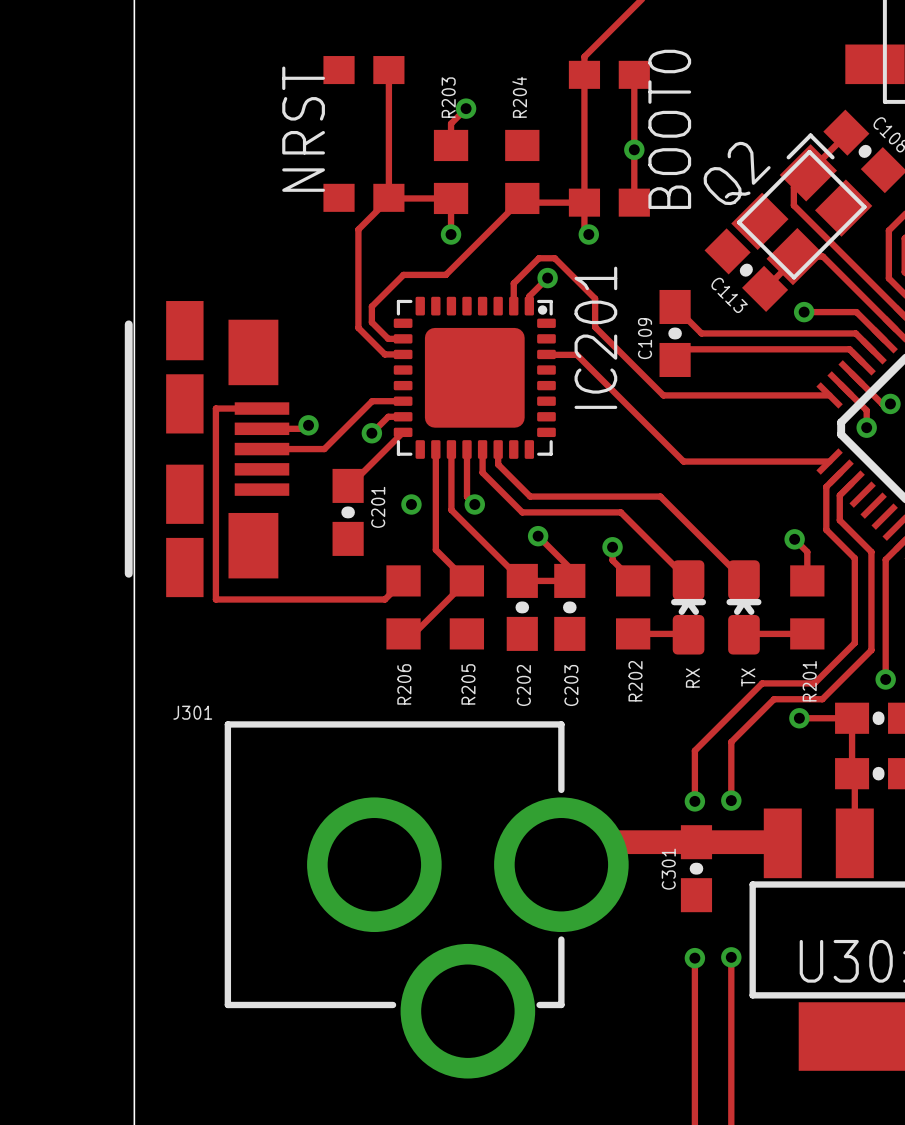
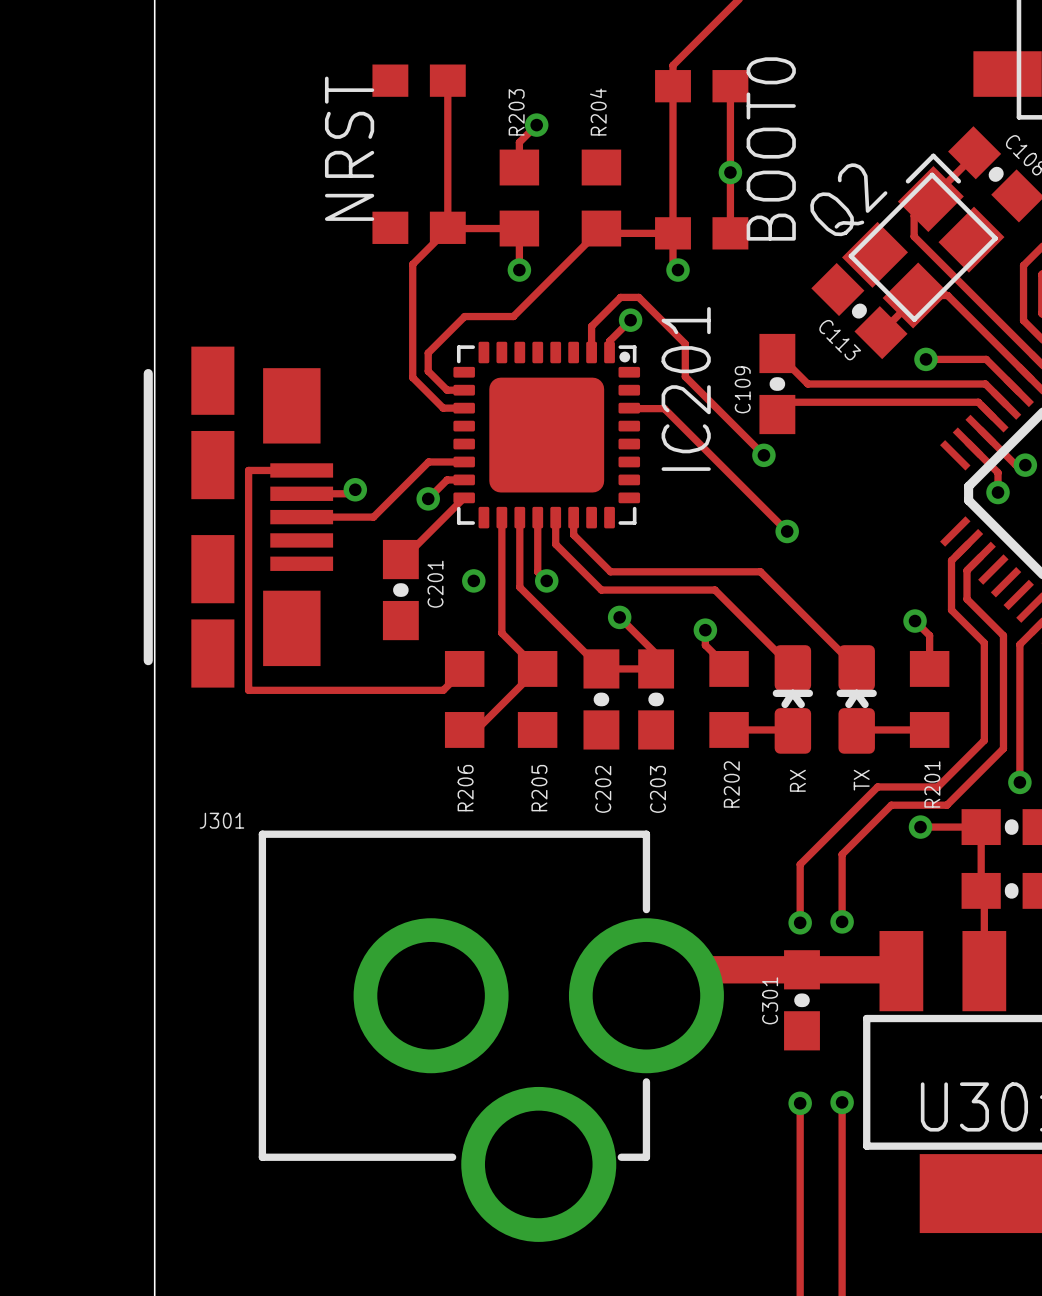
track: (663, 395) (829, 395) -> none
via: none -> (763, 455)
track: (683, 461) (829, 461) -> none
via: none -> (787, 531)

